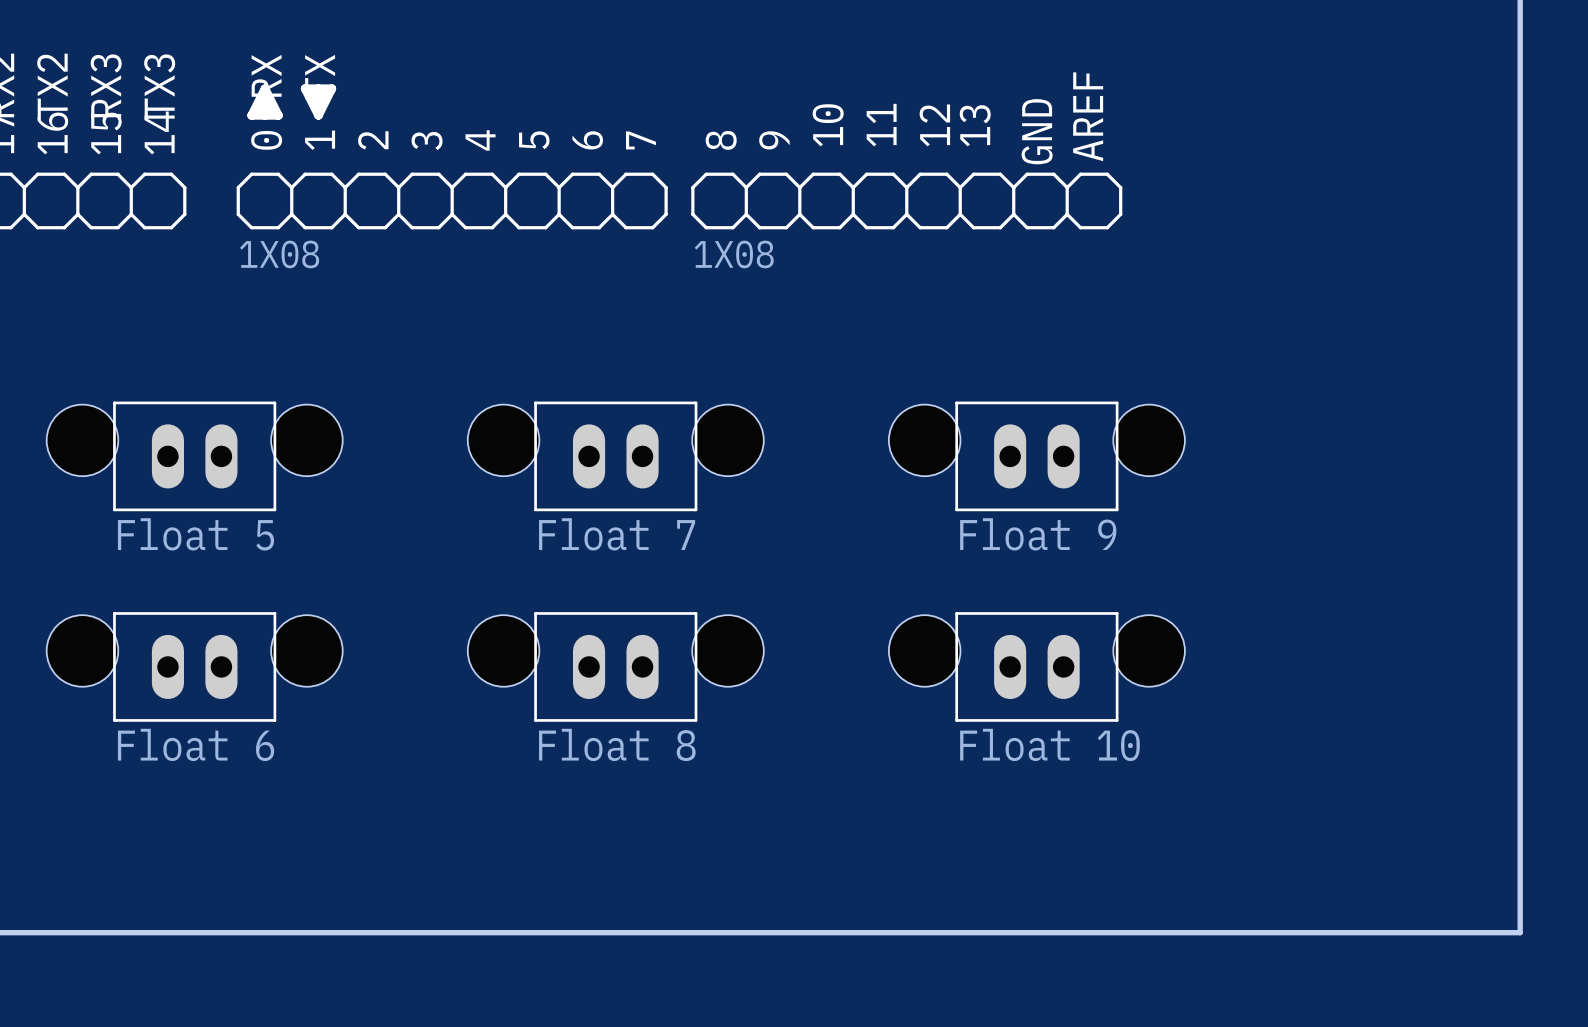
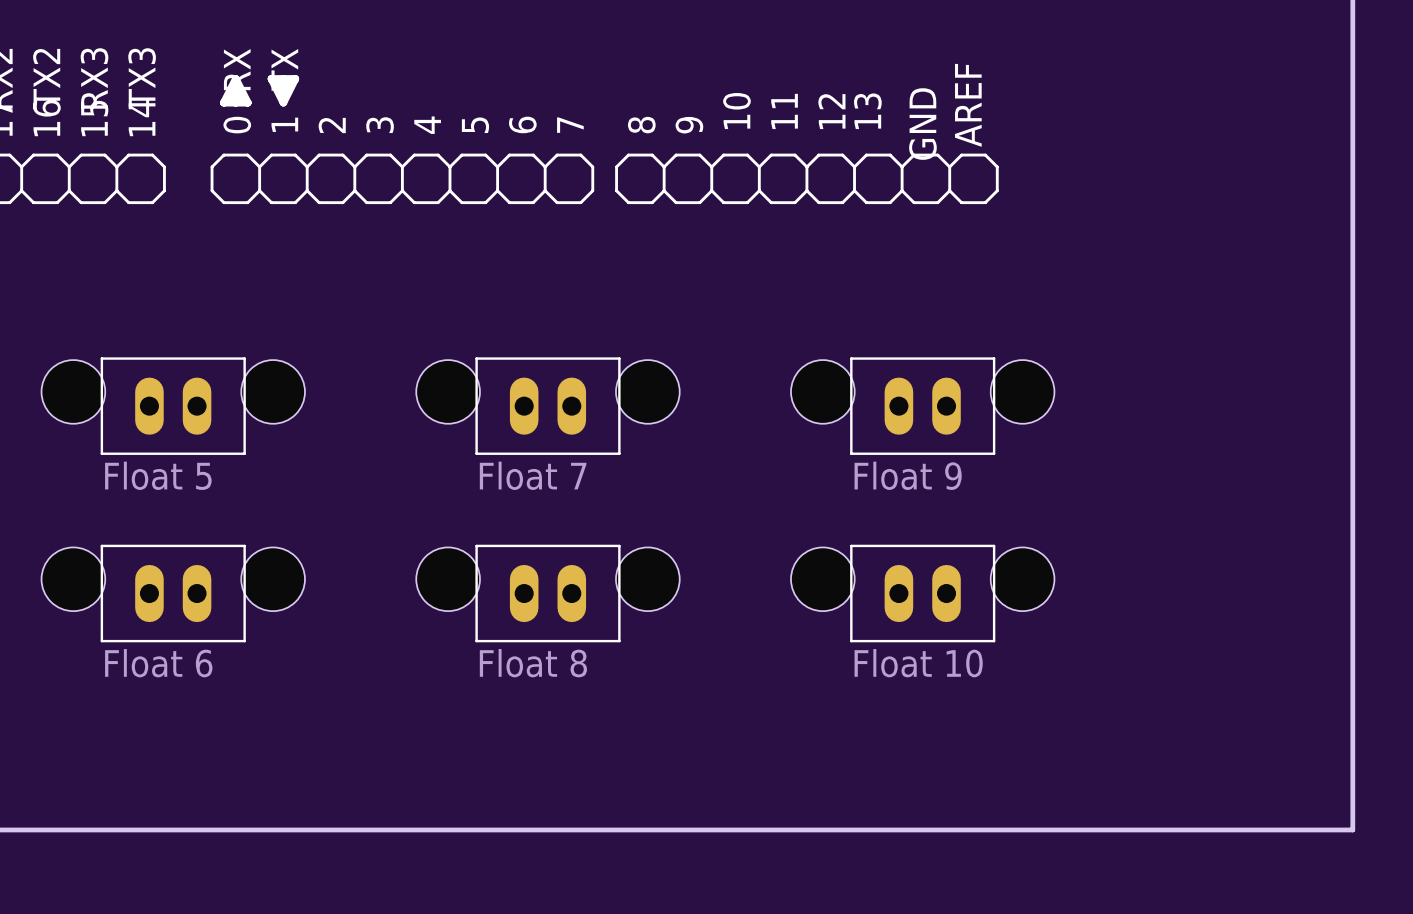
part value: 1X08 (279, 254) -> none
part value: 1X08 (734, 254) -> none

